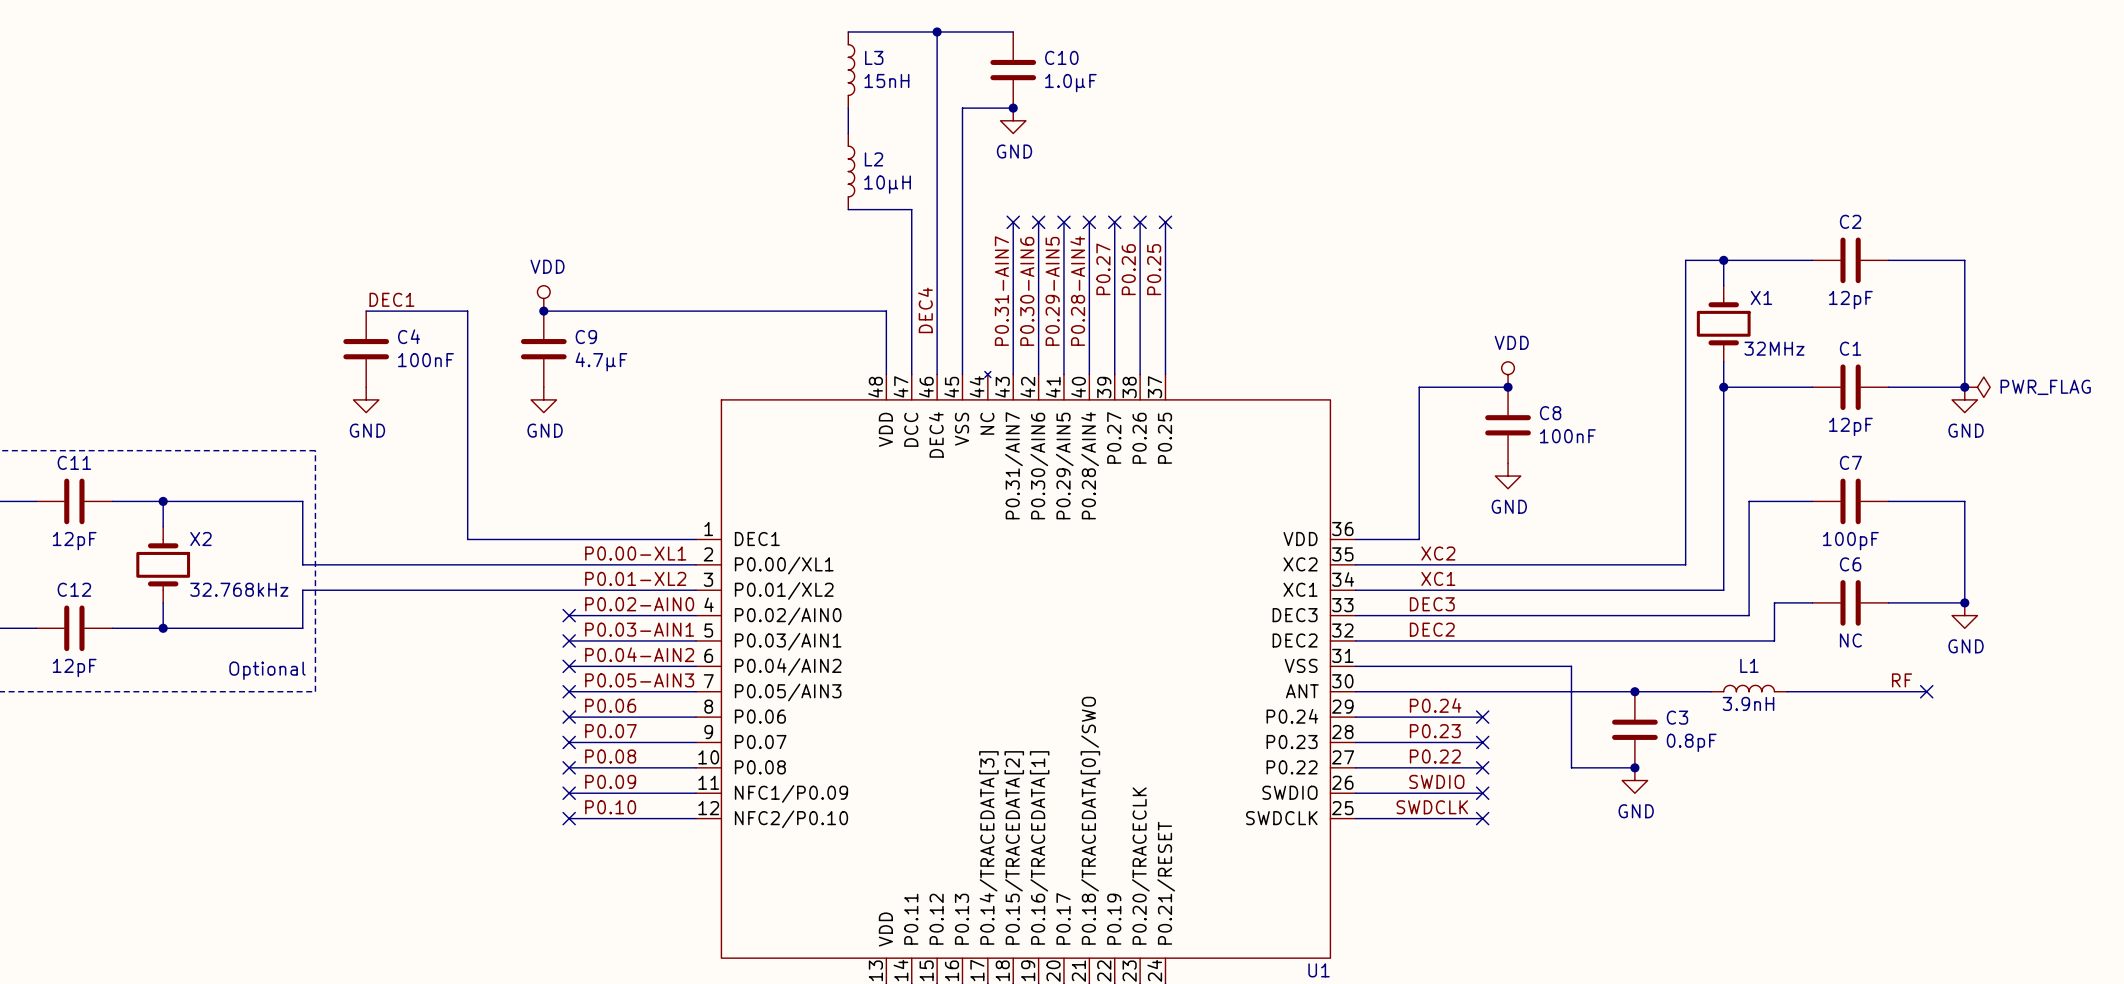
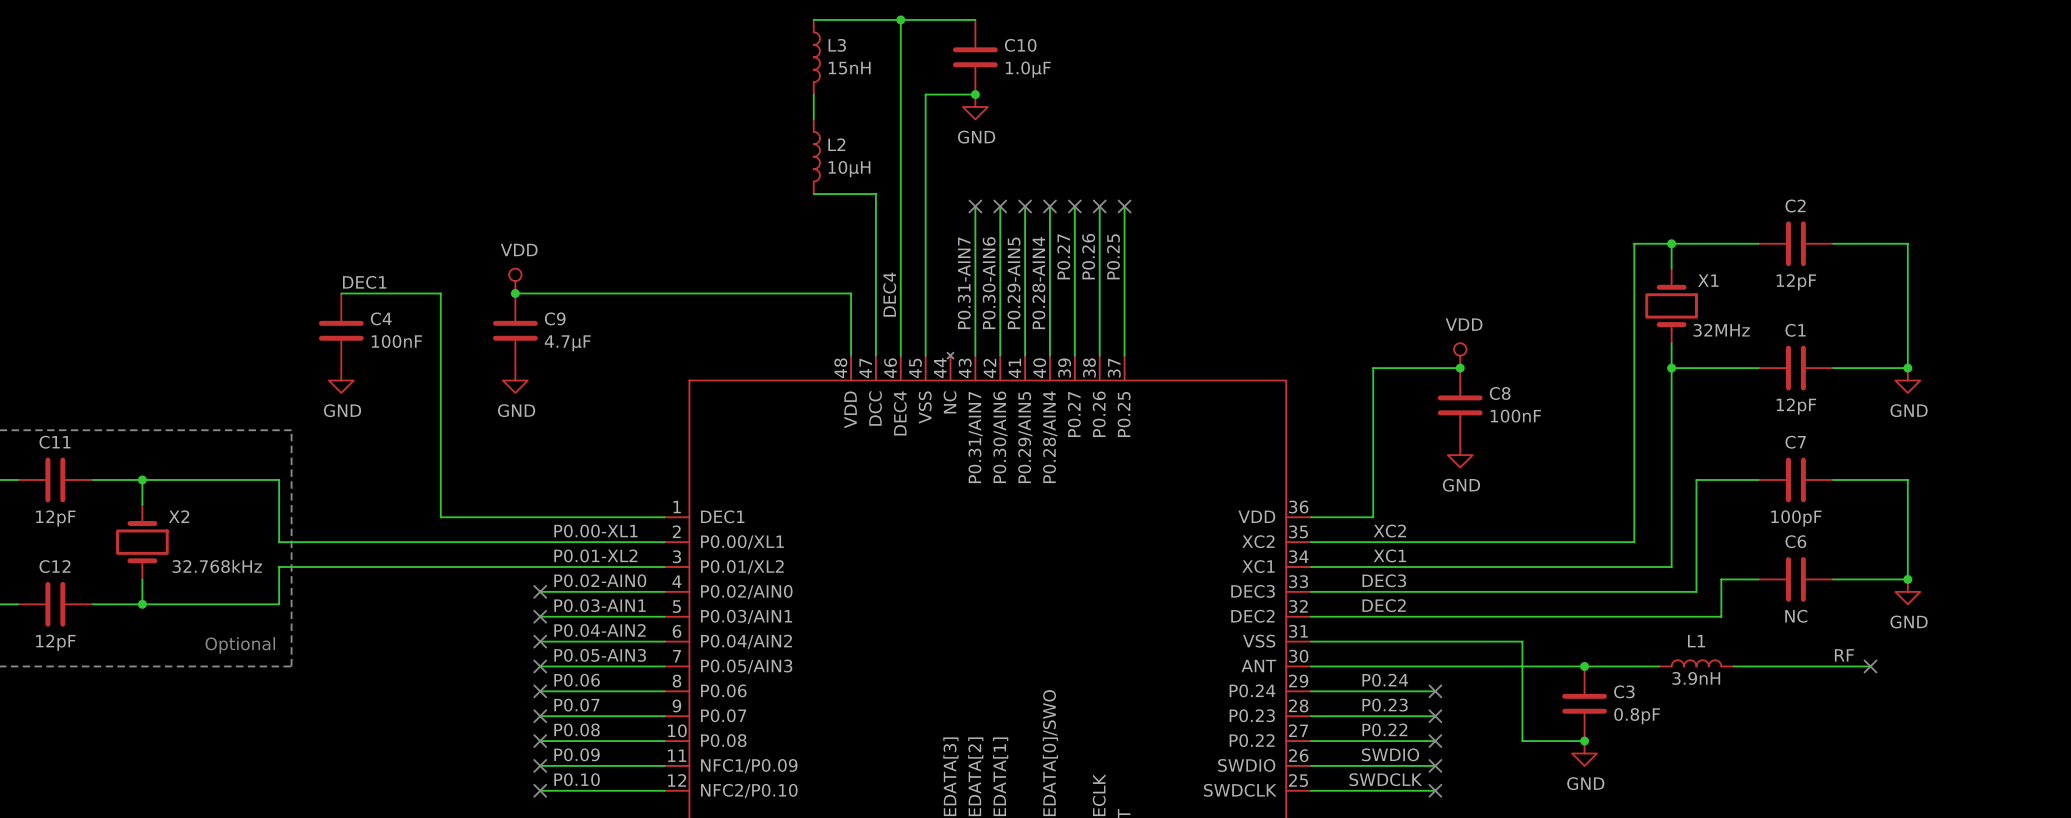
power symbol: PWR_FLAG (1977, 387) -> none

